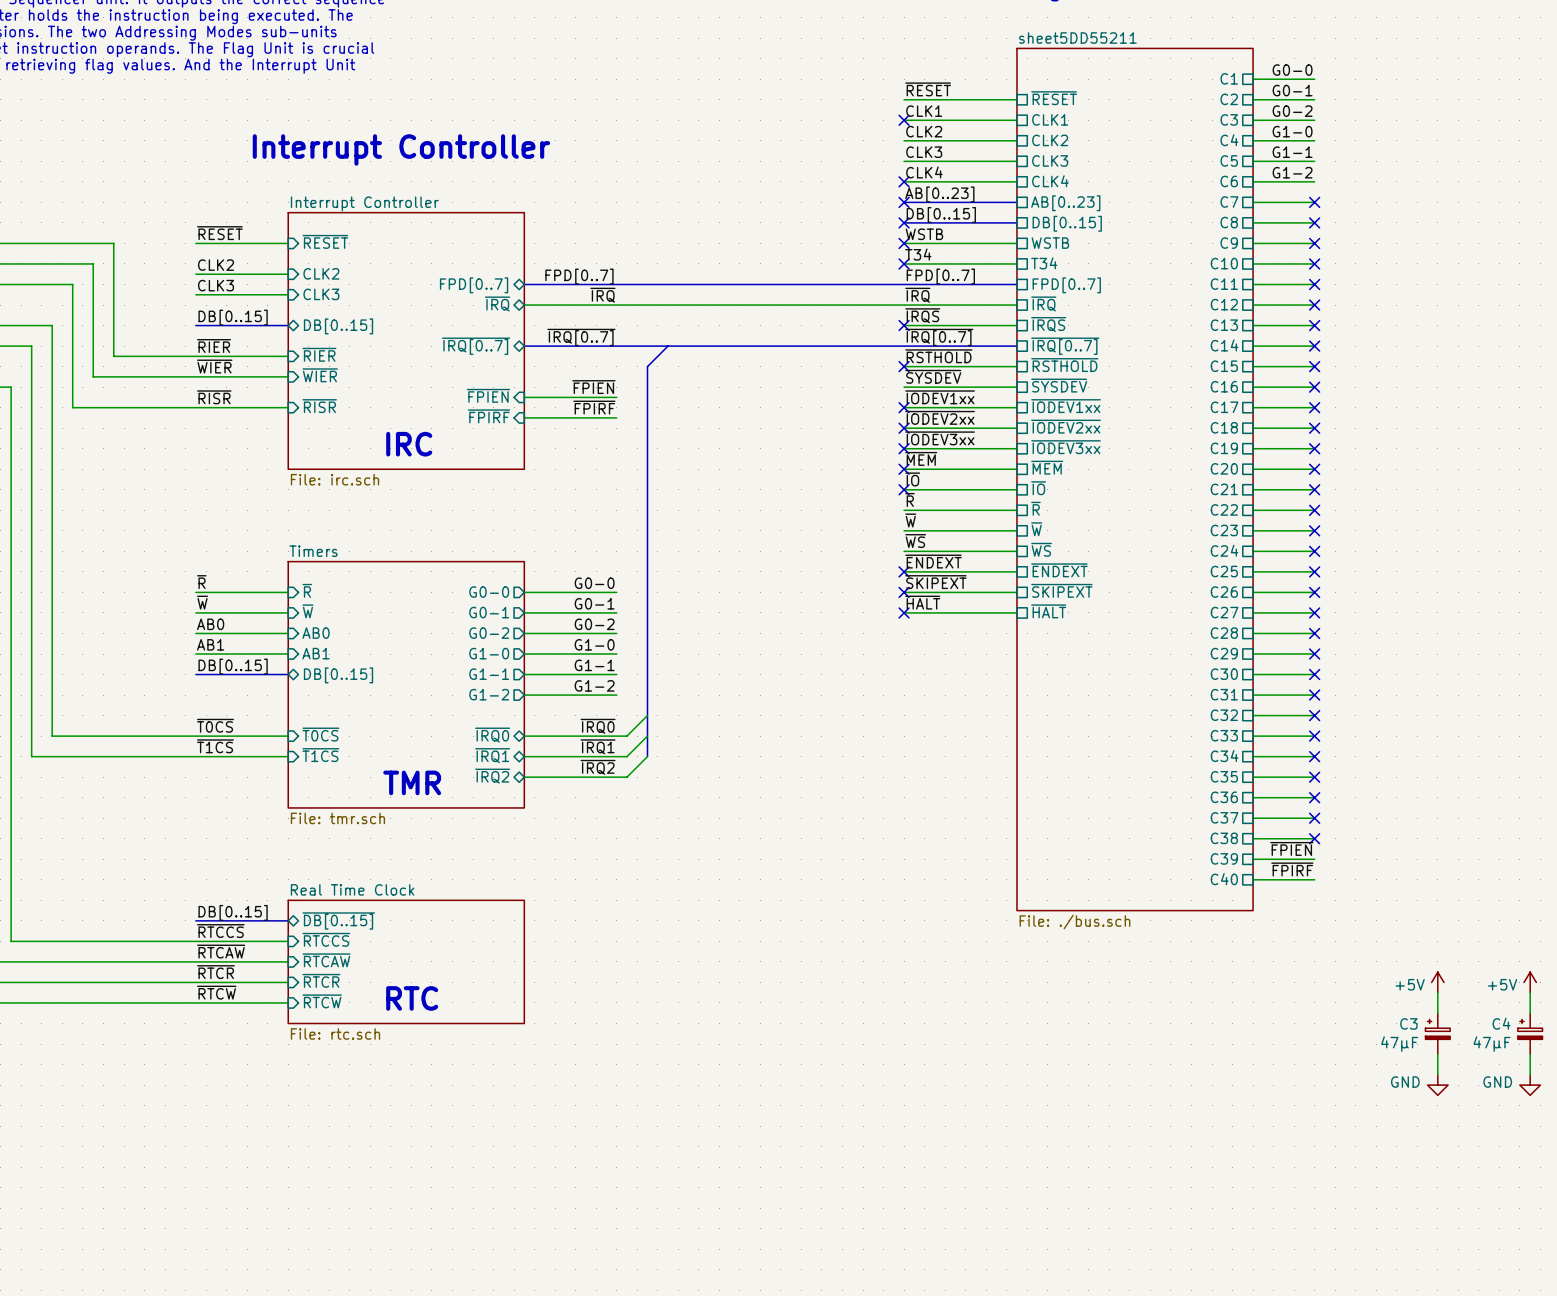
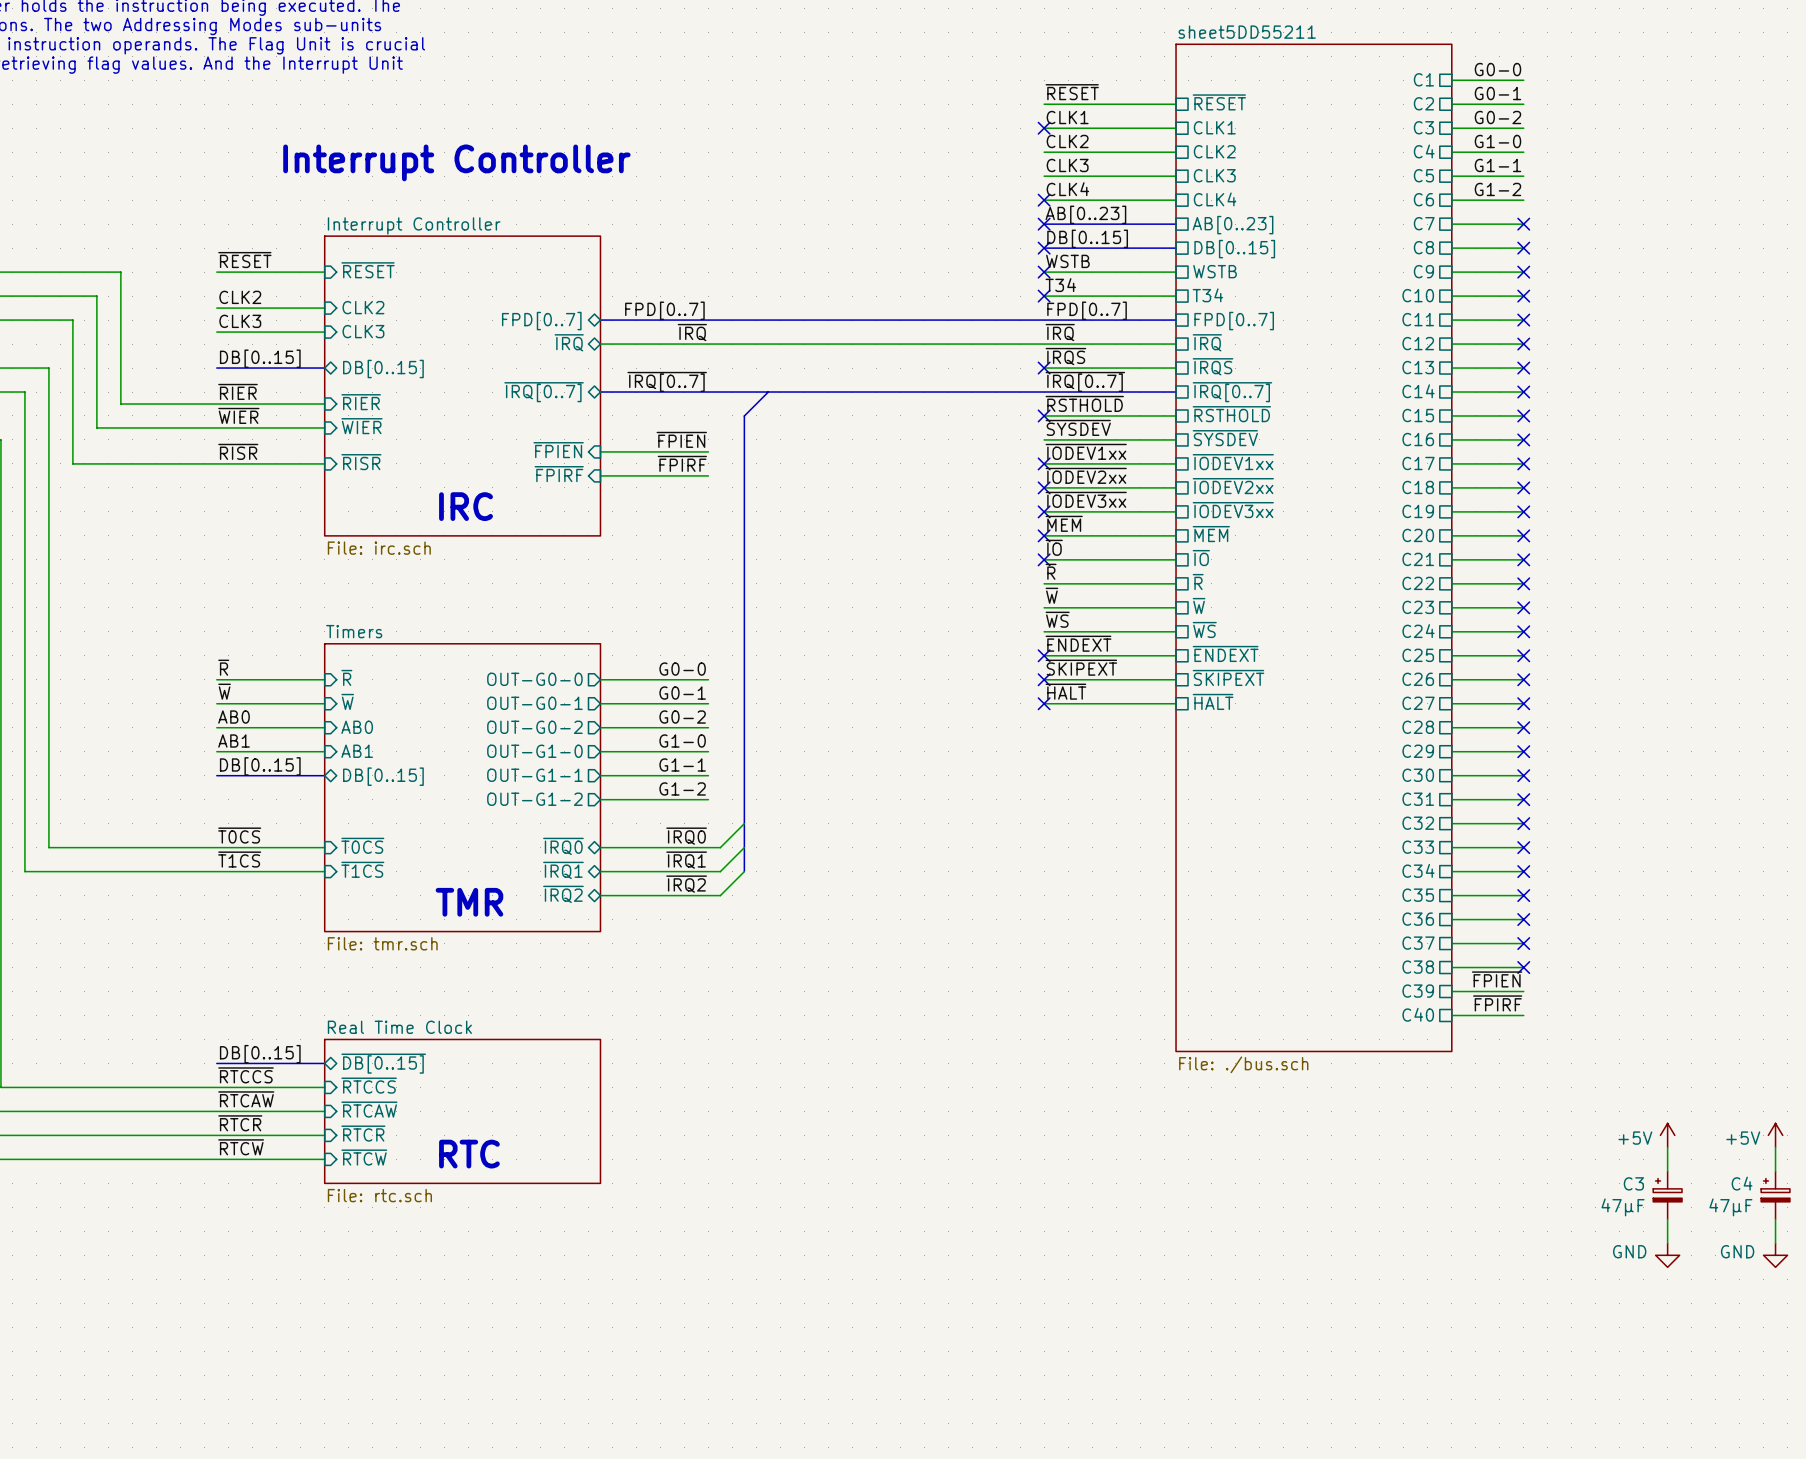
sheet pin: G0-0 (489, 592) -> OUT-G0-0 (534, 679)
sheet pin: G0-1 (489, 612) -> OUT-G0-1 (534, 703)
sheet pin: G0-2 (489, 633) -> OUT-G0-2 (534, 727)
sheet pin: G1-0 (489, 653) -> OUT-G1-0 (534, 751)
sheet pin: G1-1 (489, 674) -> OUT-G1-1 (534, 775)
sheet pin: G1-2 (489, 694) -> OUT-G1-2 (534, 799)

